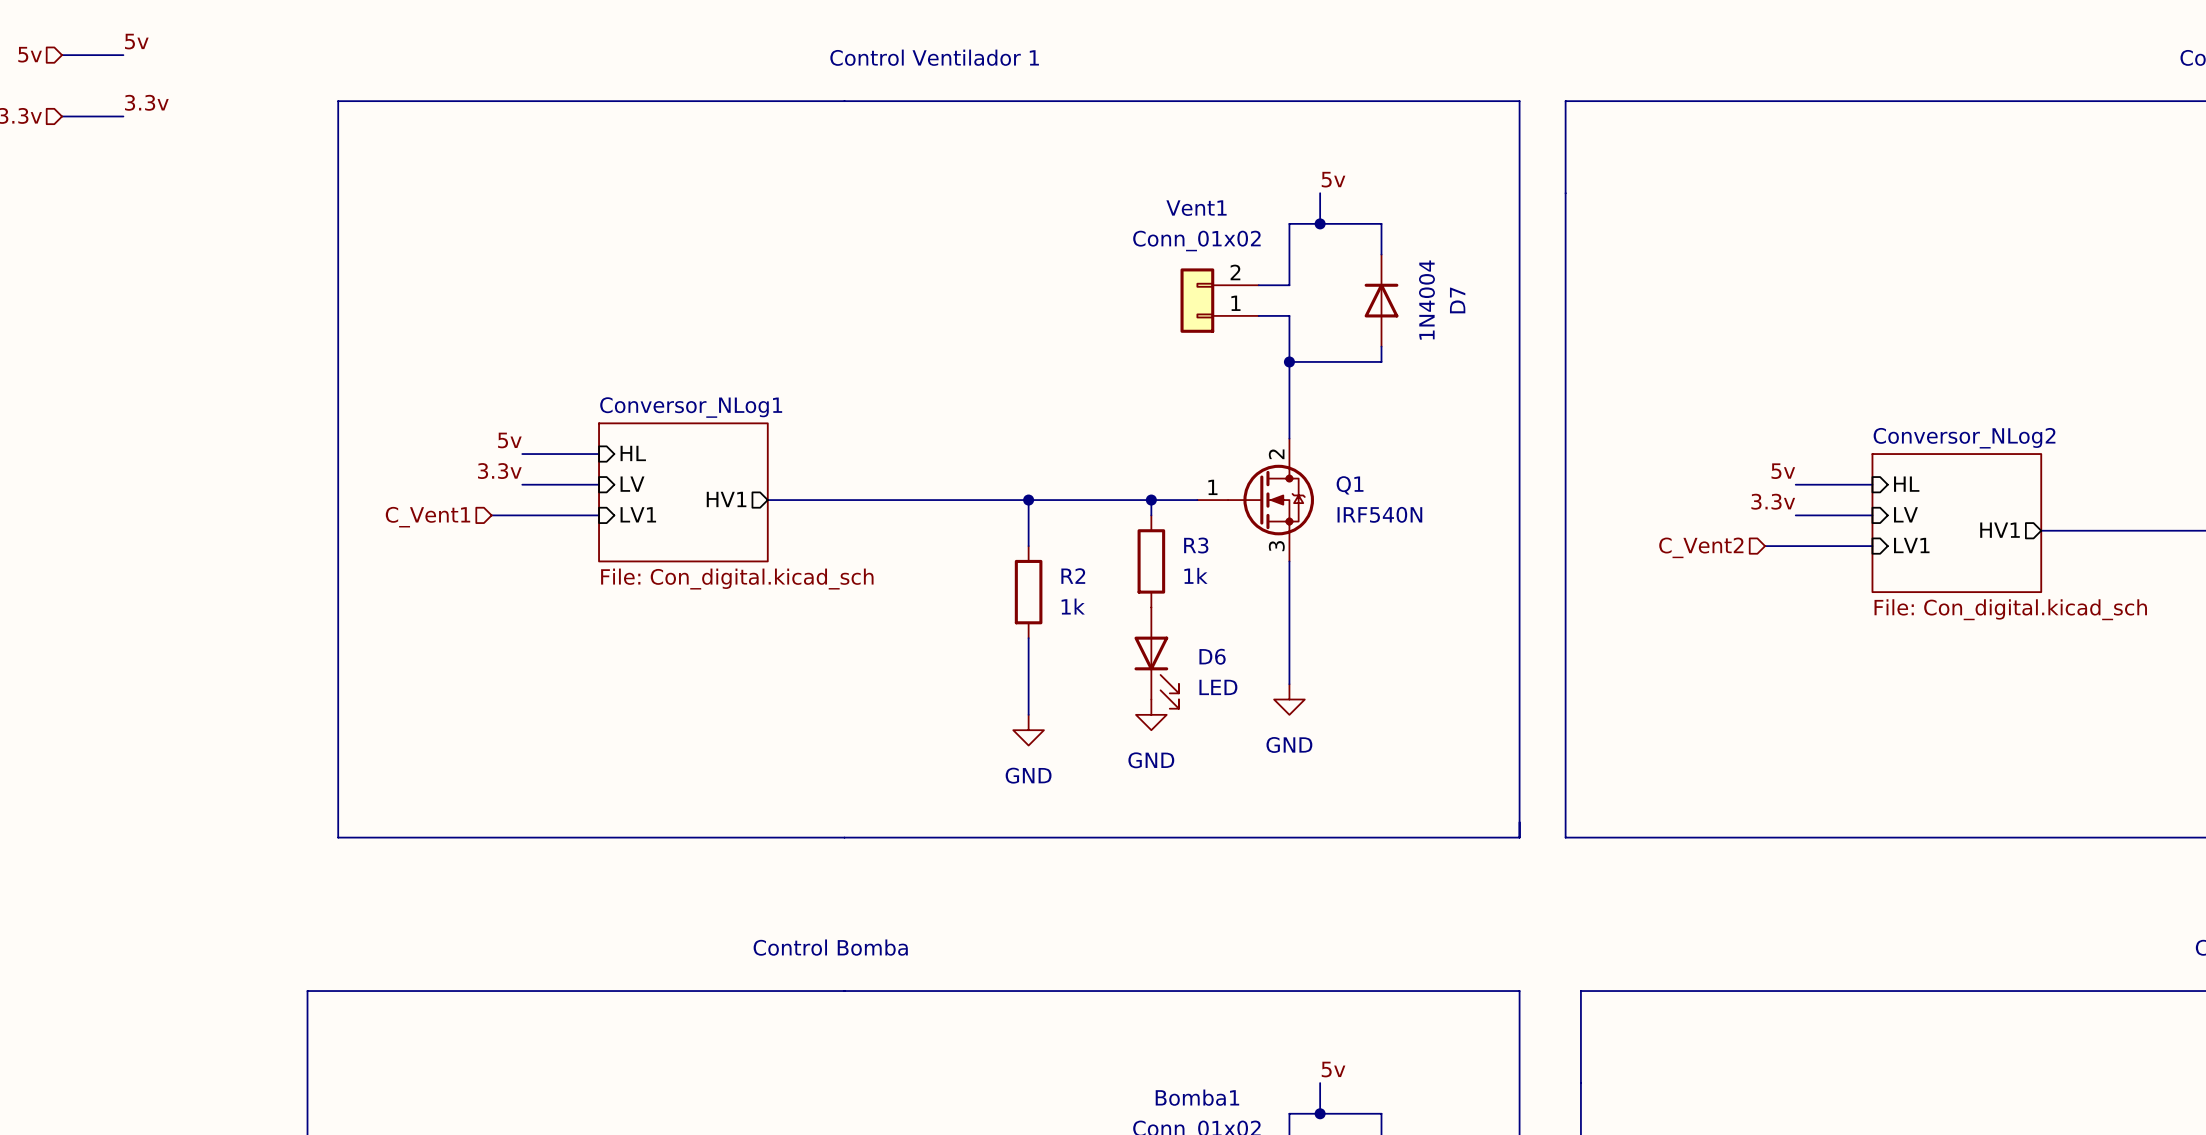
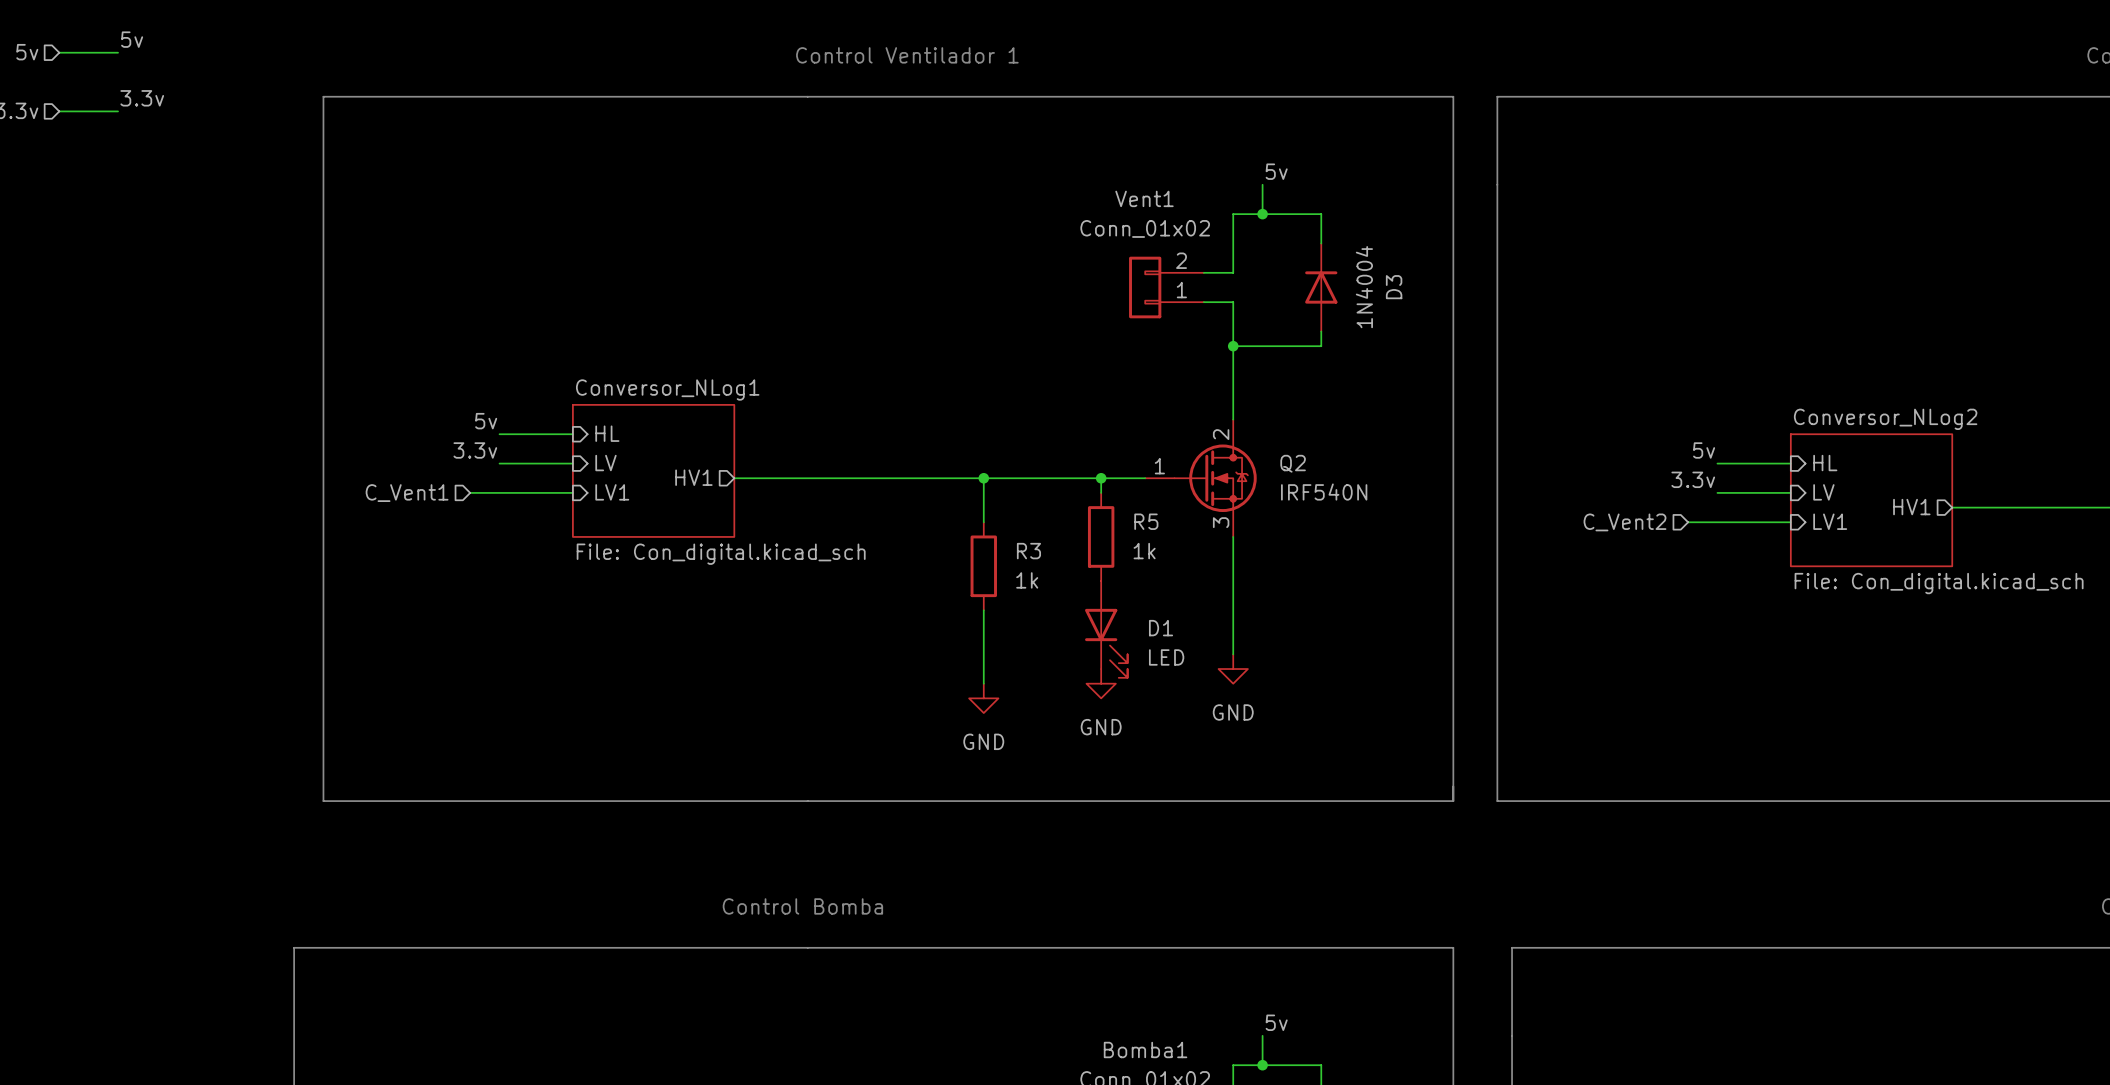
D7 name: D7 (1457, 300) -> D3 (1394, 287)
Q1 name: Q1 (1350, 485) -> Q2 (1293, 463)
R3 name: R3 (1196, 545) -> R5 (1146, 521)
R2 name: R2 (1073, 576) -> R3 (1028, 551)
D6 name: D6 (1212, 656) -> D1 (1161, 628)

